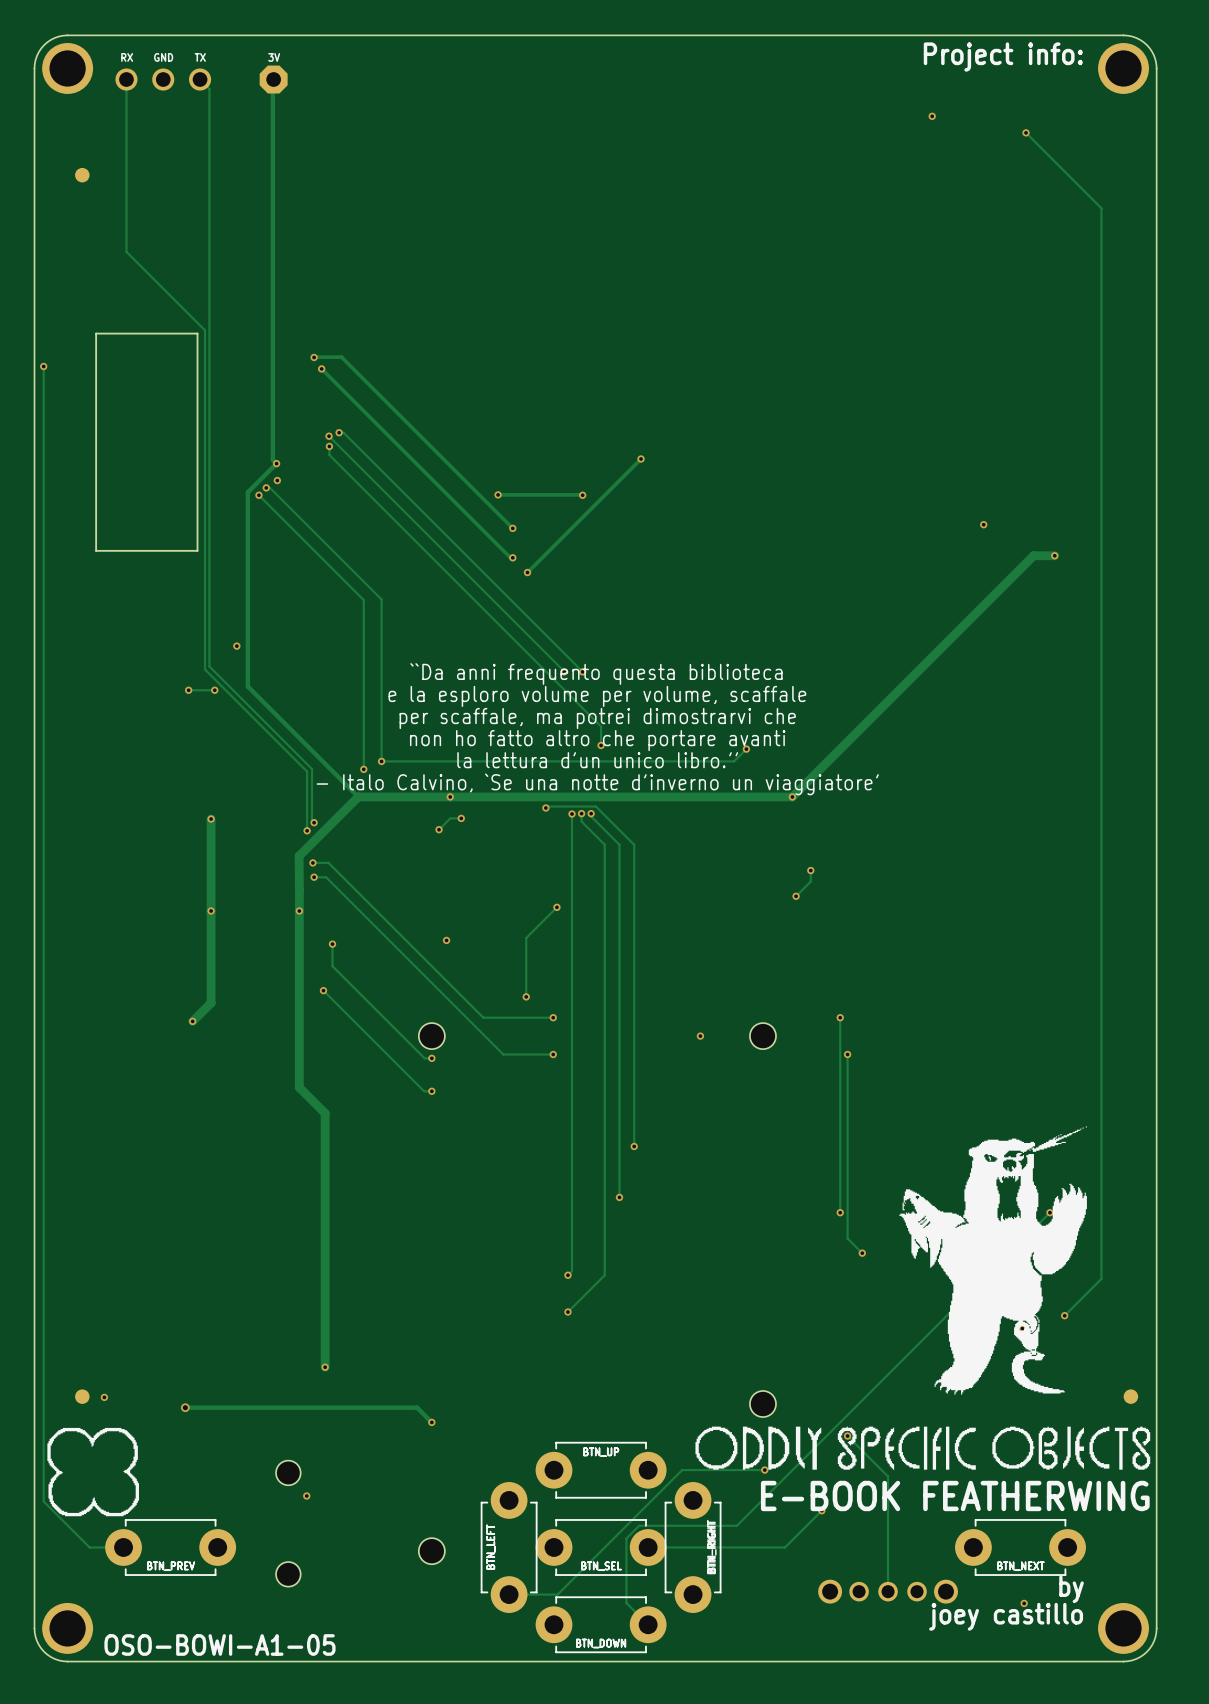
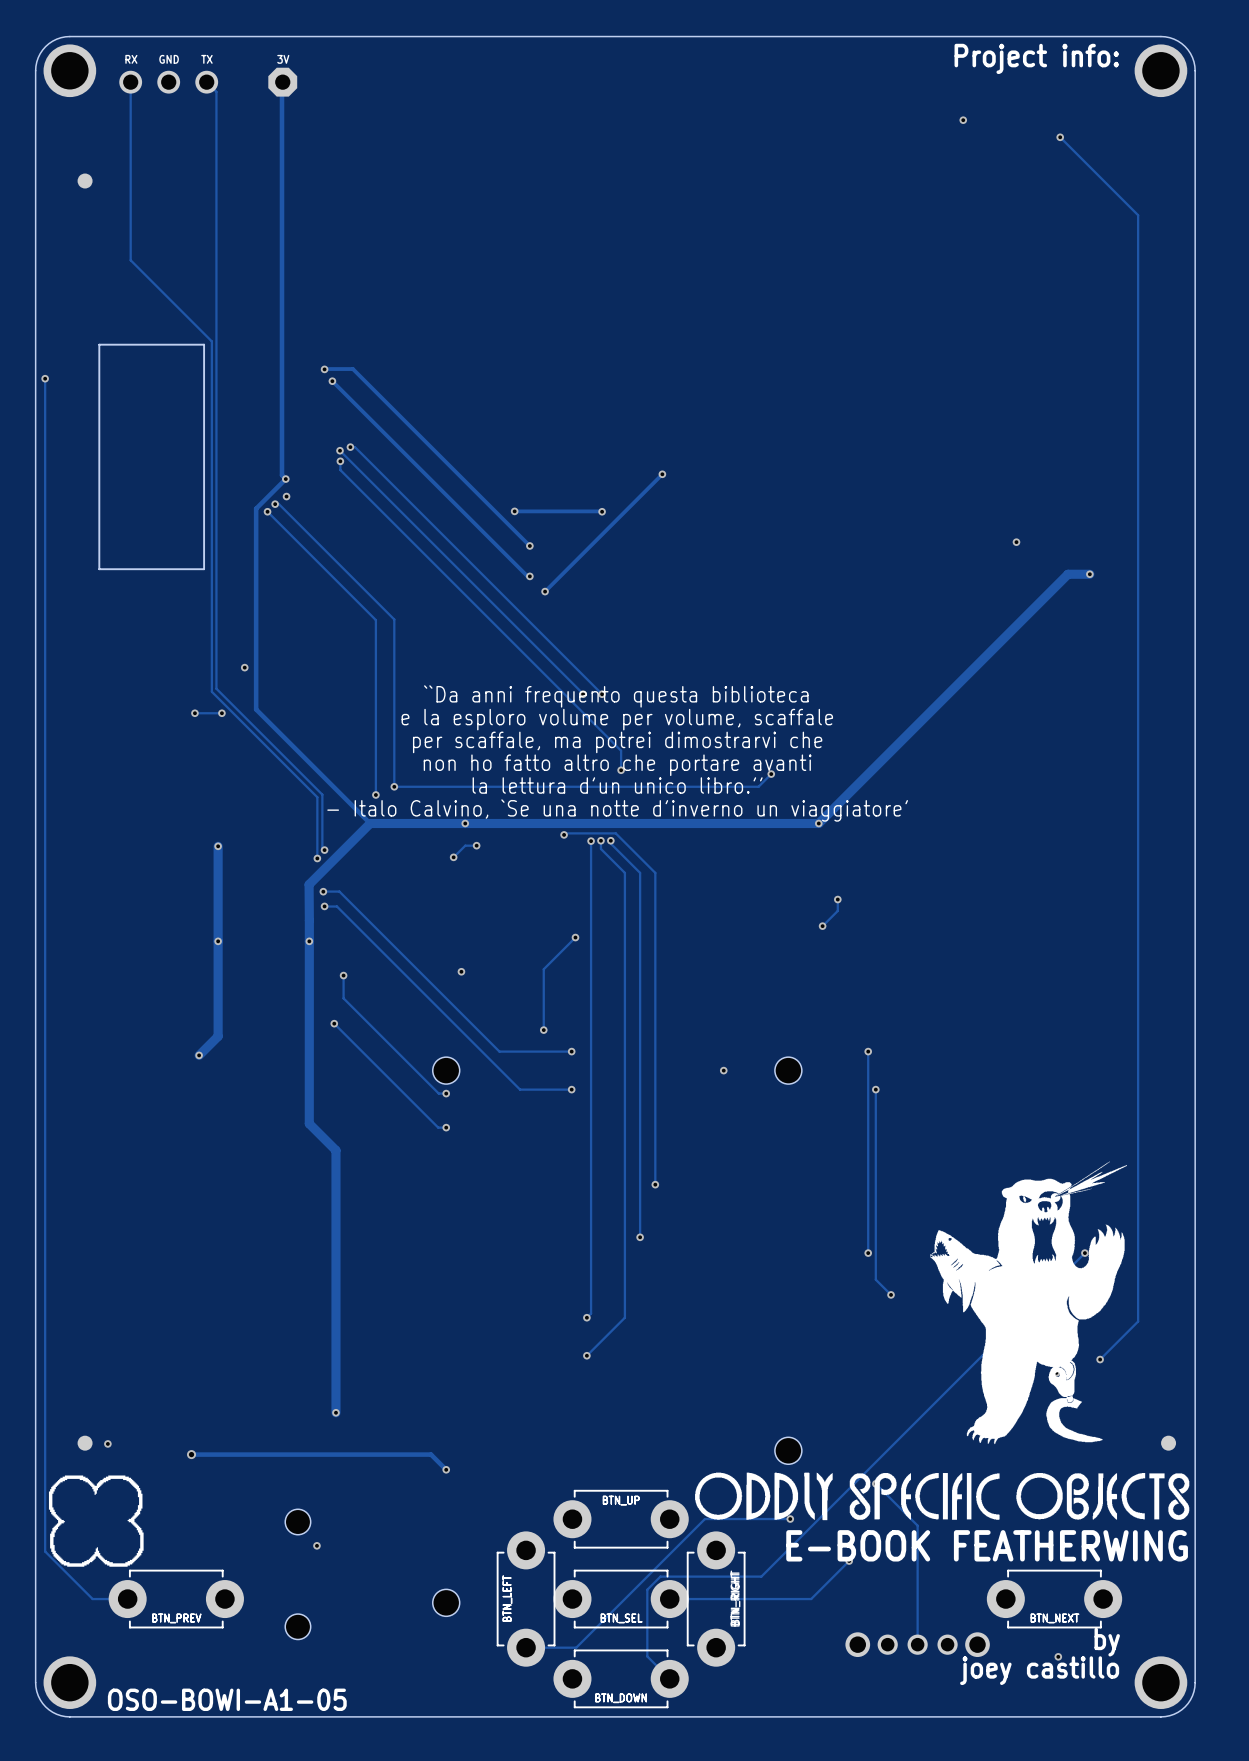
drawing shape: [899, 1126, 1087, 1395] -> [929, 1161, 1127, 1445]
drawing shape: [695, 1426, 1151, 1470] -> [695, 1472, 1190, 1521]

